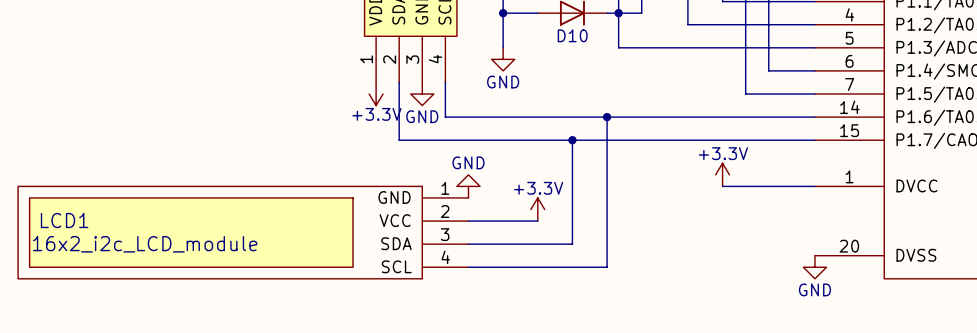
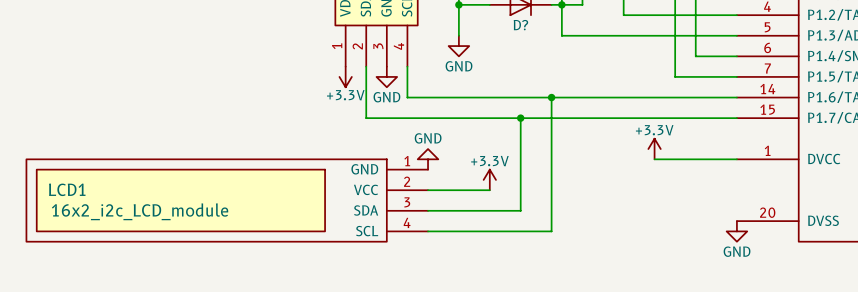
D10 name: D10 (572, 35) -> D? (520, 25)

